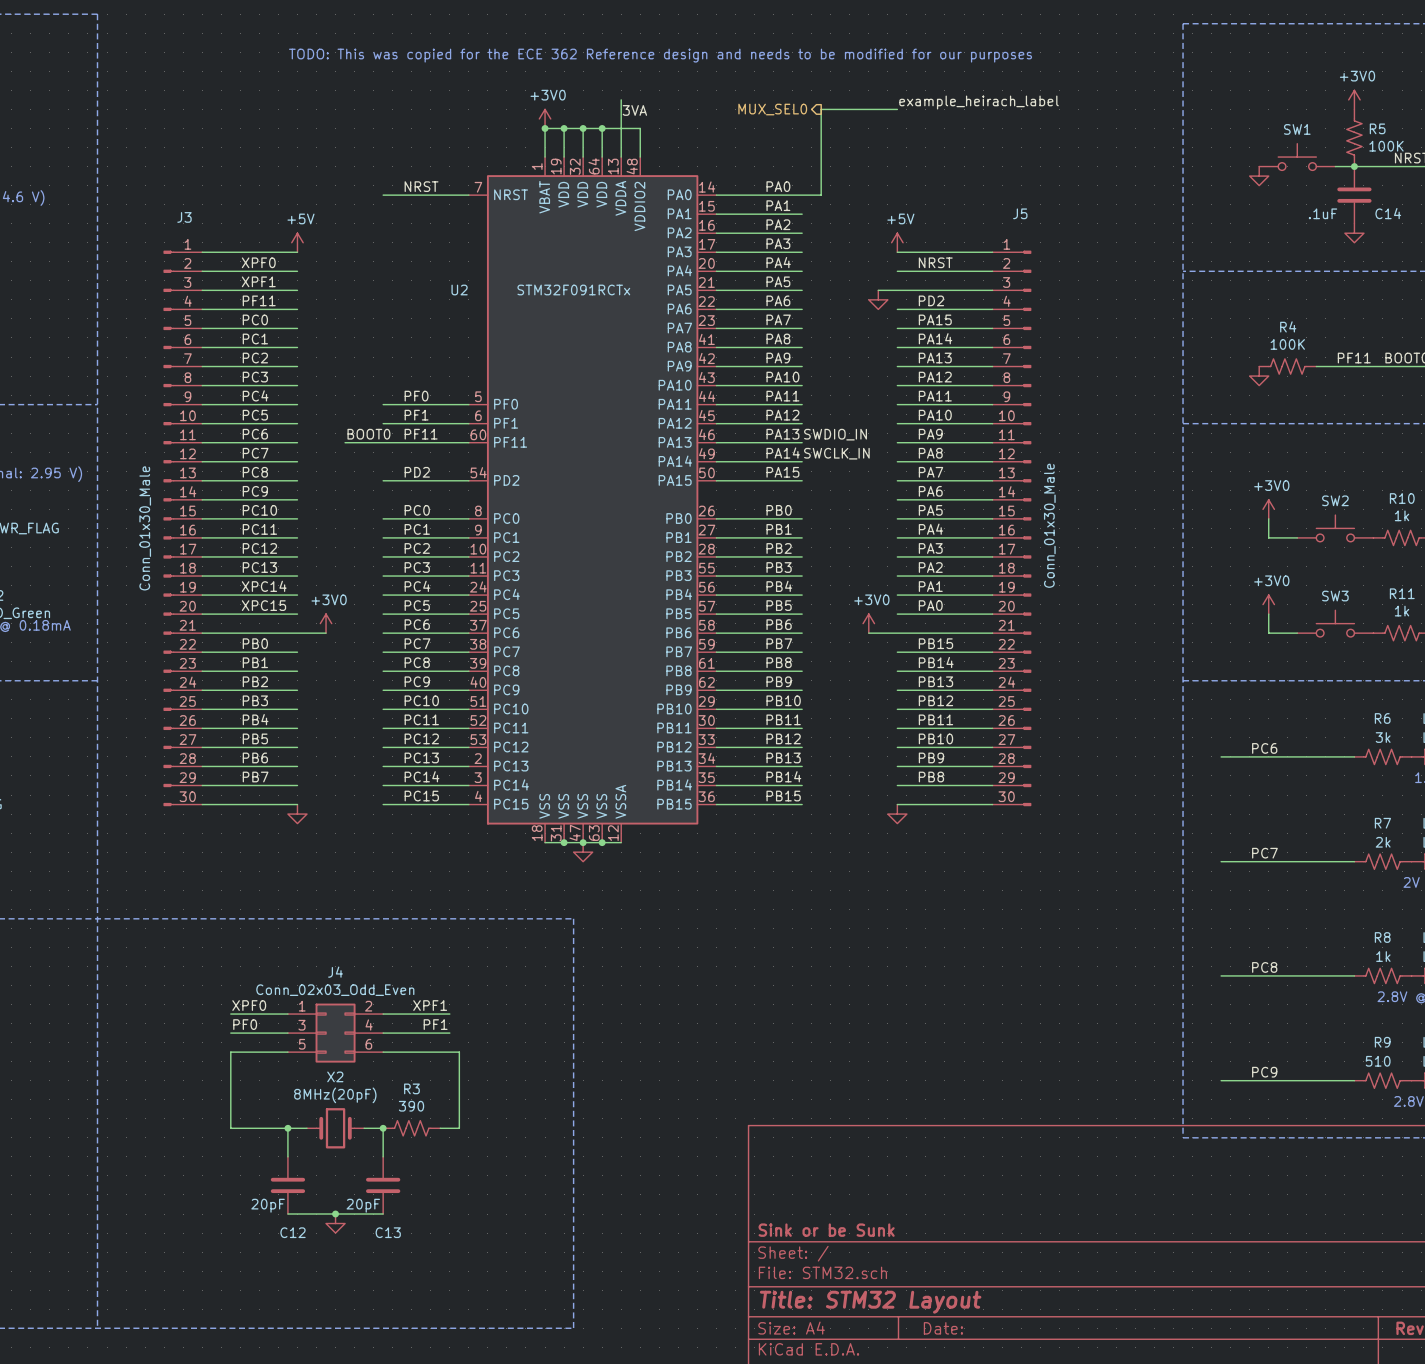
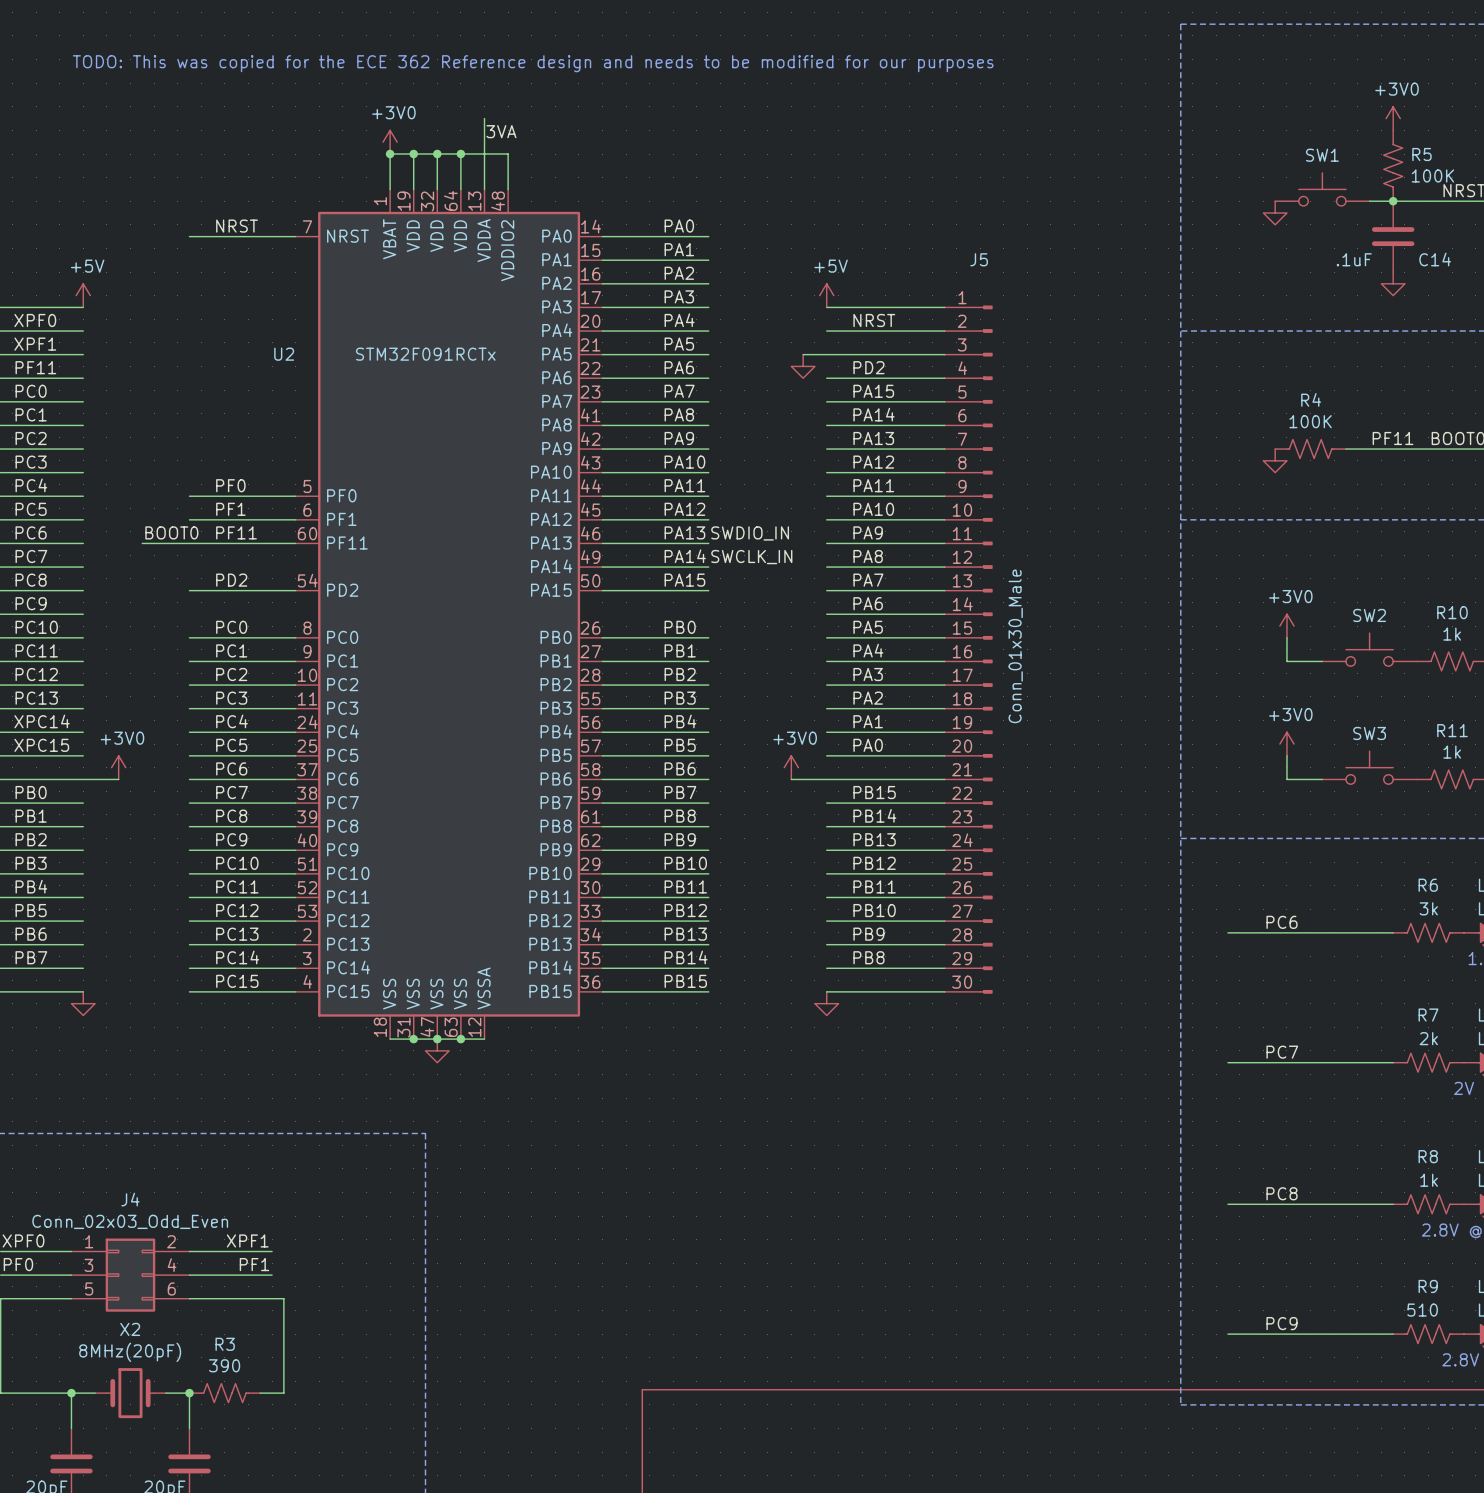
label: example_heirach_label (979, 102) -> none
hierarchical label: MUX_SEL0 (772, 109) -> none
wire: (897, 109) (821, 109) (821, 195) (802, 195) -> none

